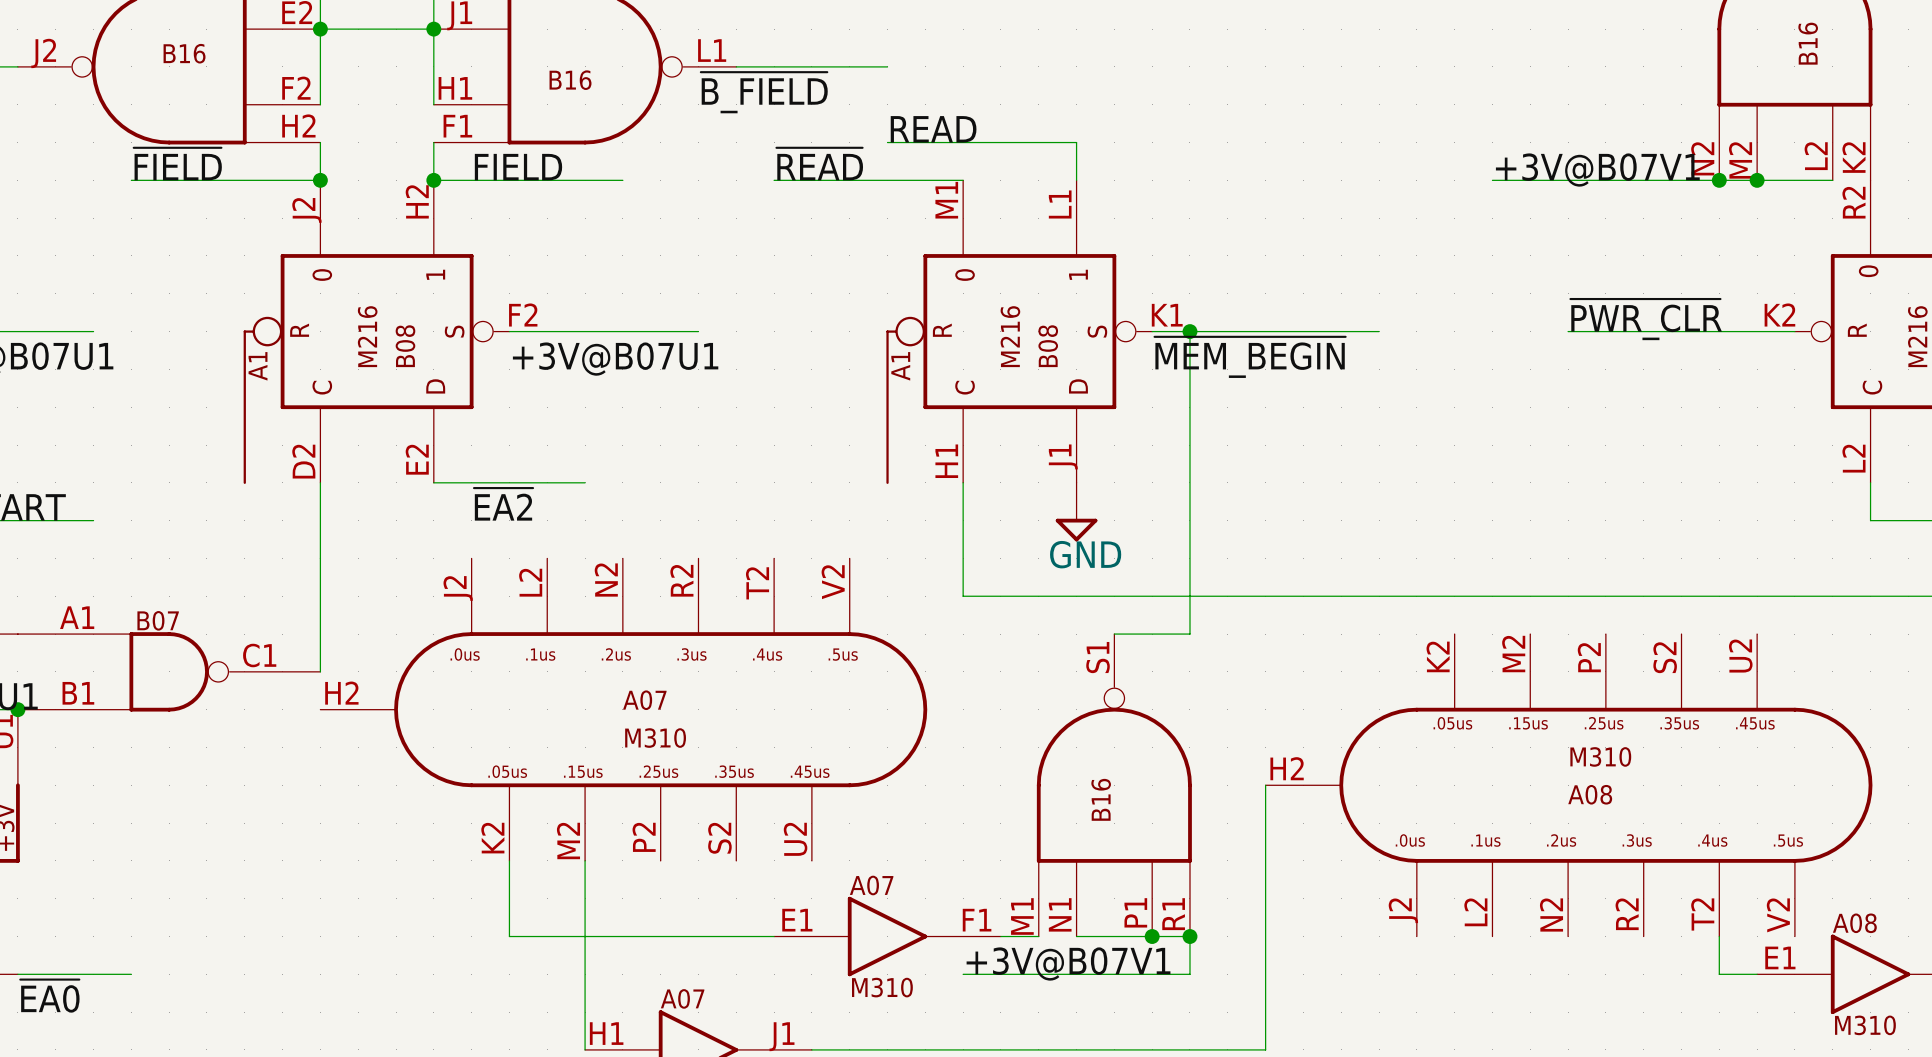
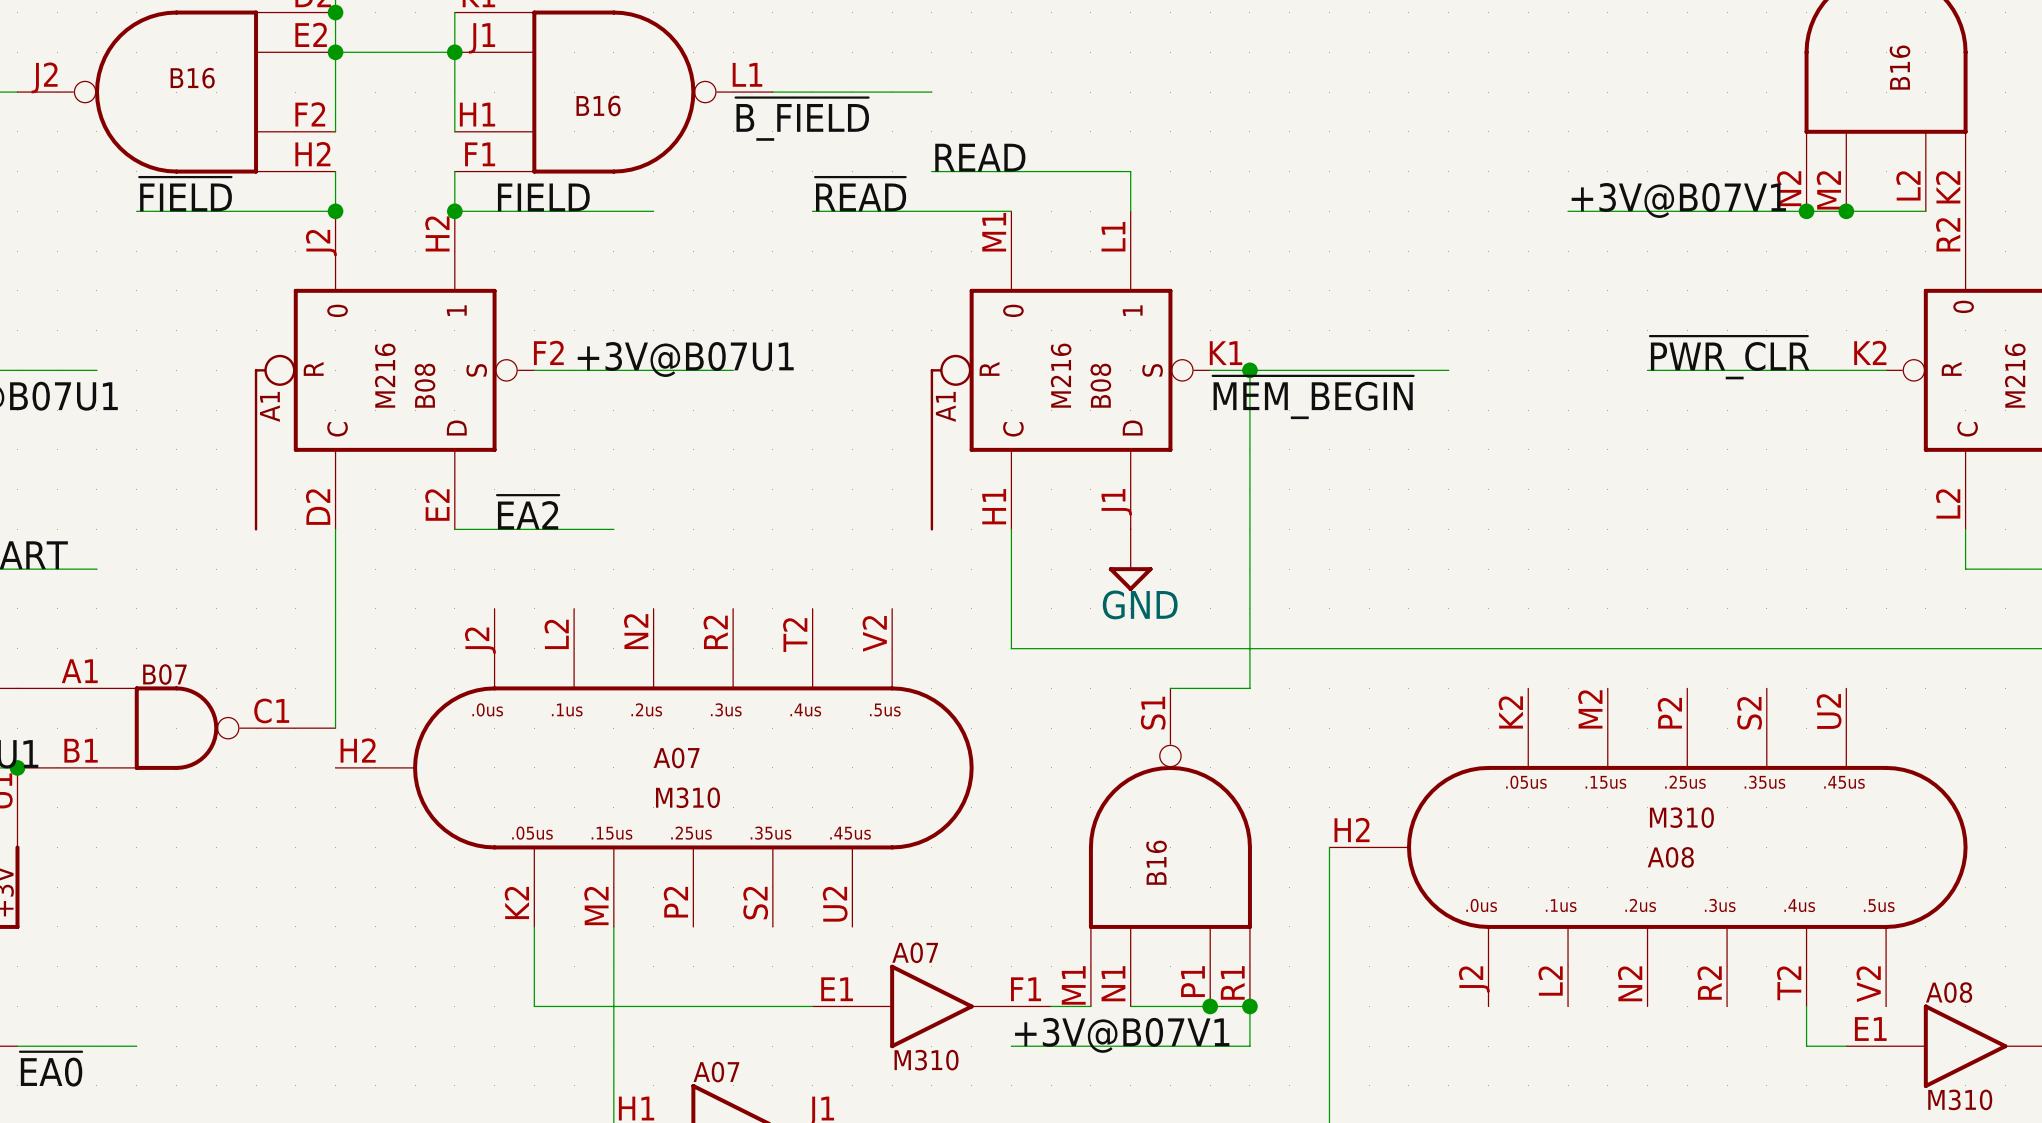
label position: +3V@B07U1 (615, 359) -> +3V@B07U1 (685, 359)
label position: ~{EA2} (503, 504) -> ~{EA2} (528, 512)

